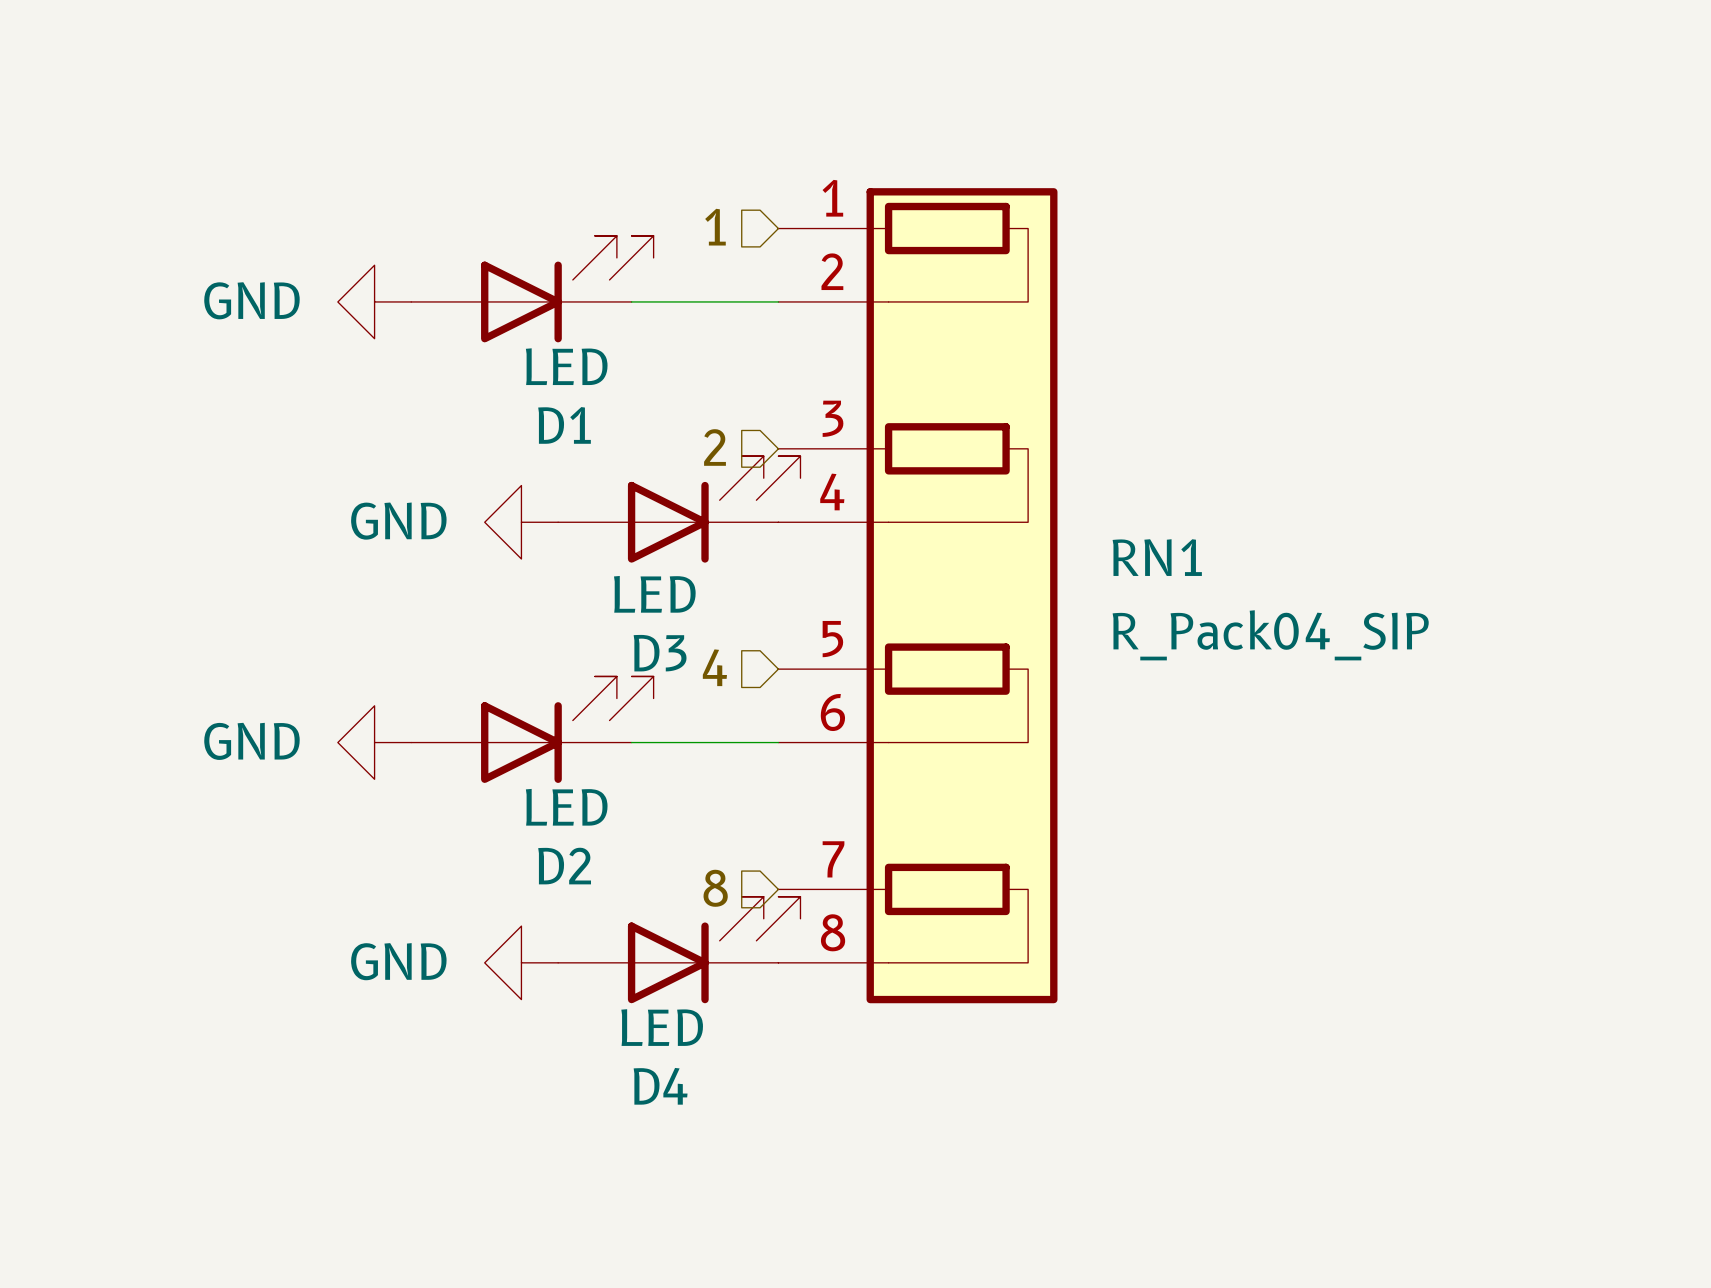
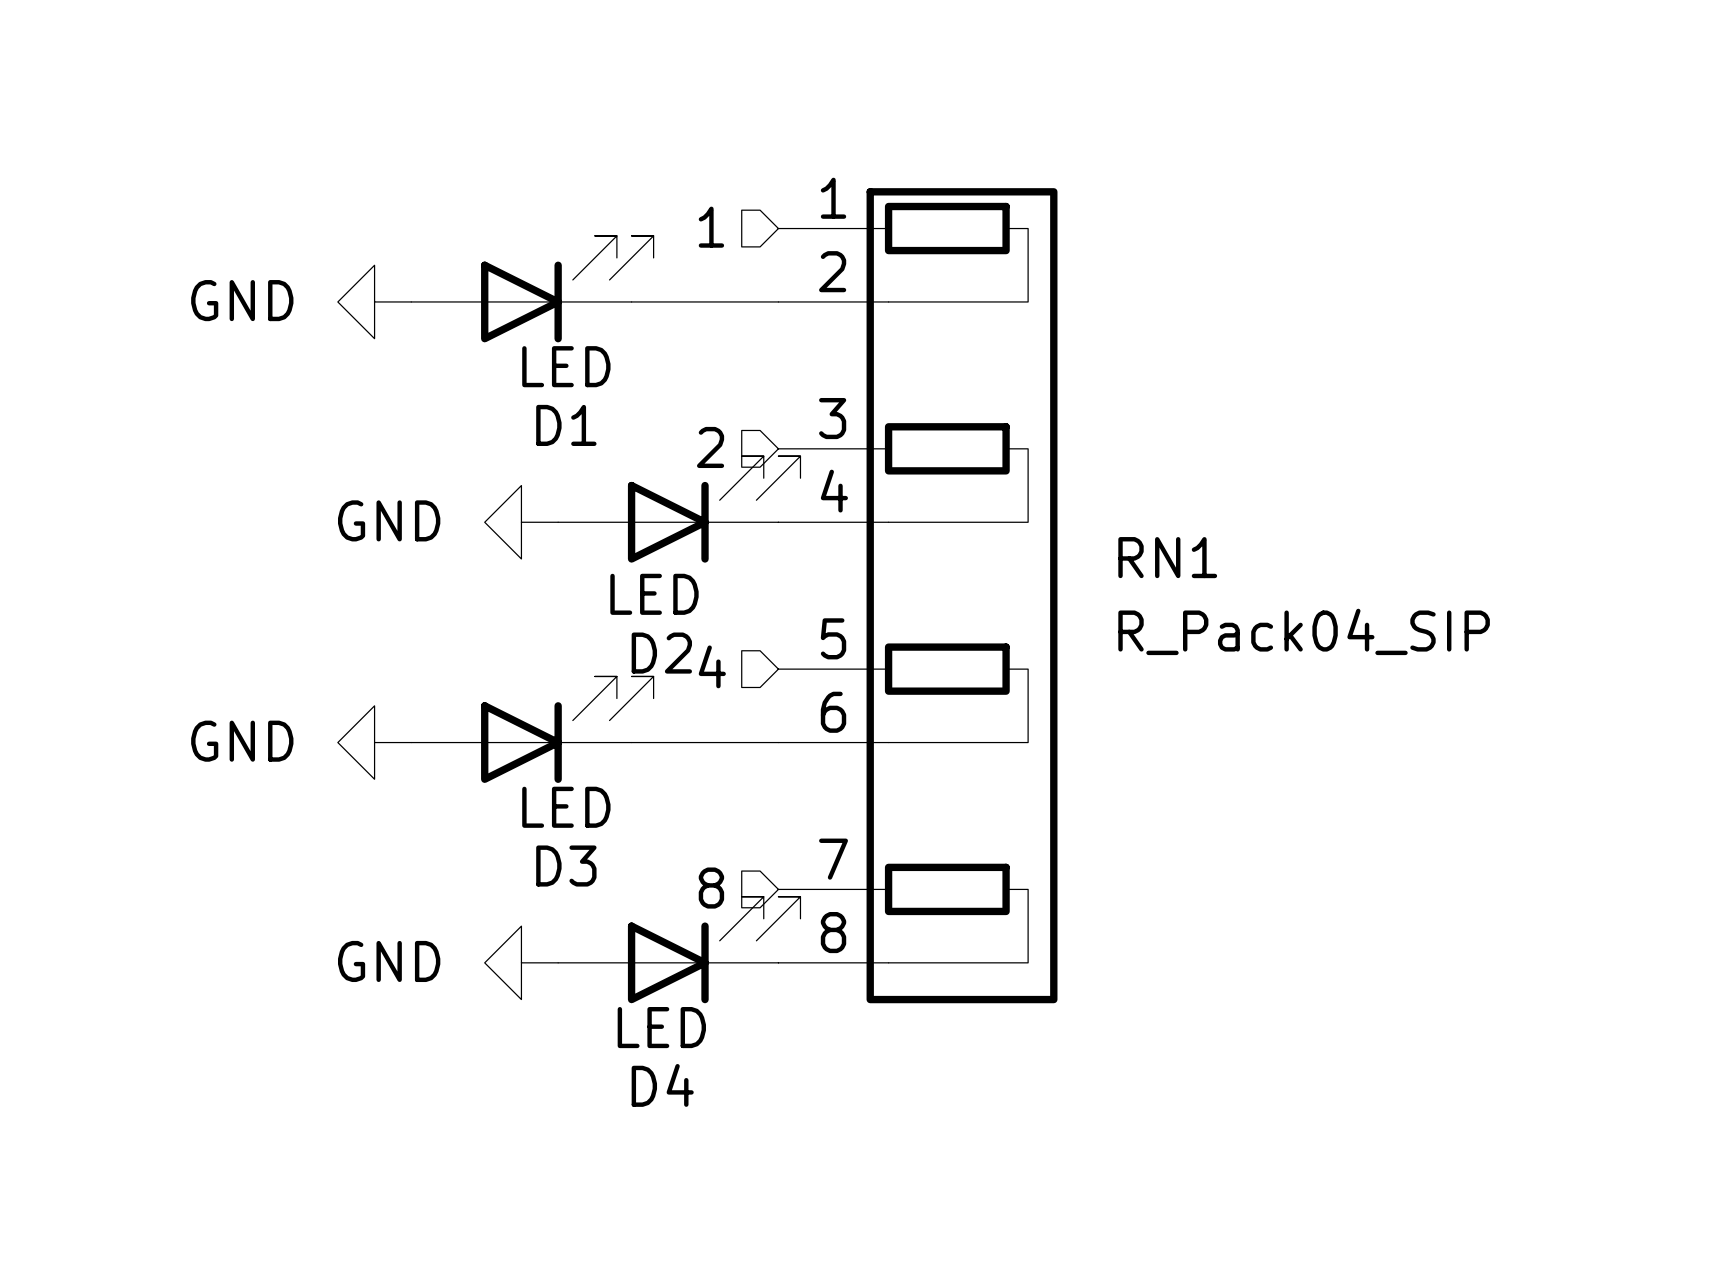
D3 name: D3 (660, 653) -> D2 (661, 653)
D2 name: D2 (564, 866) -> D3 (566, 866)

